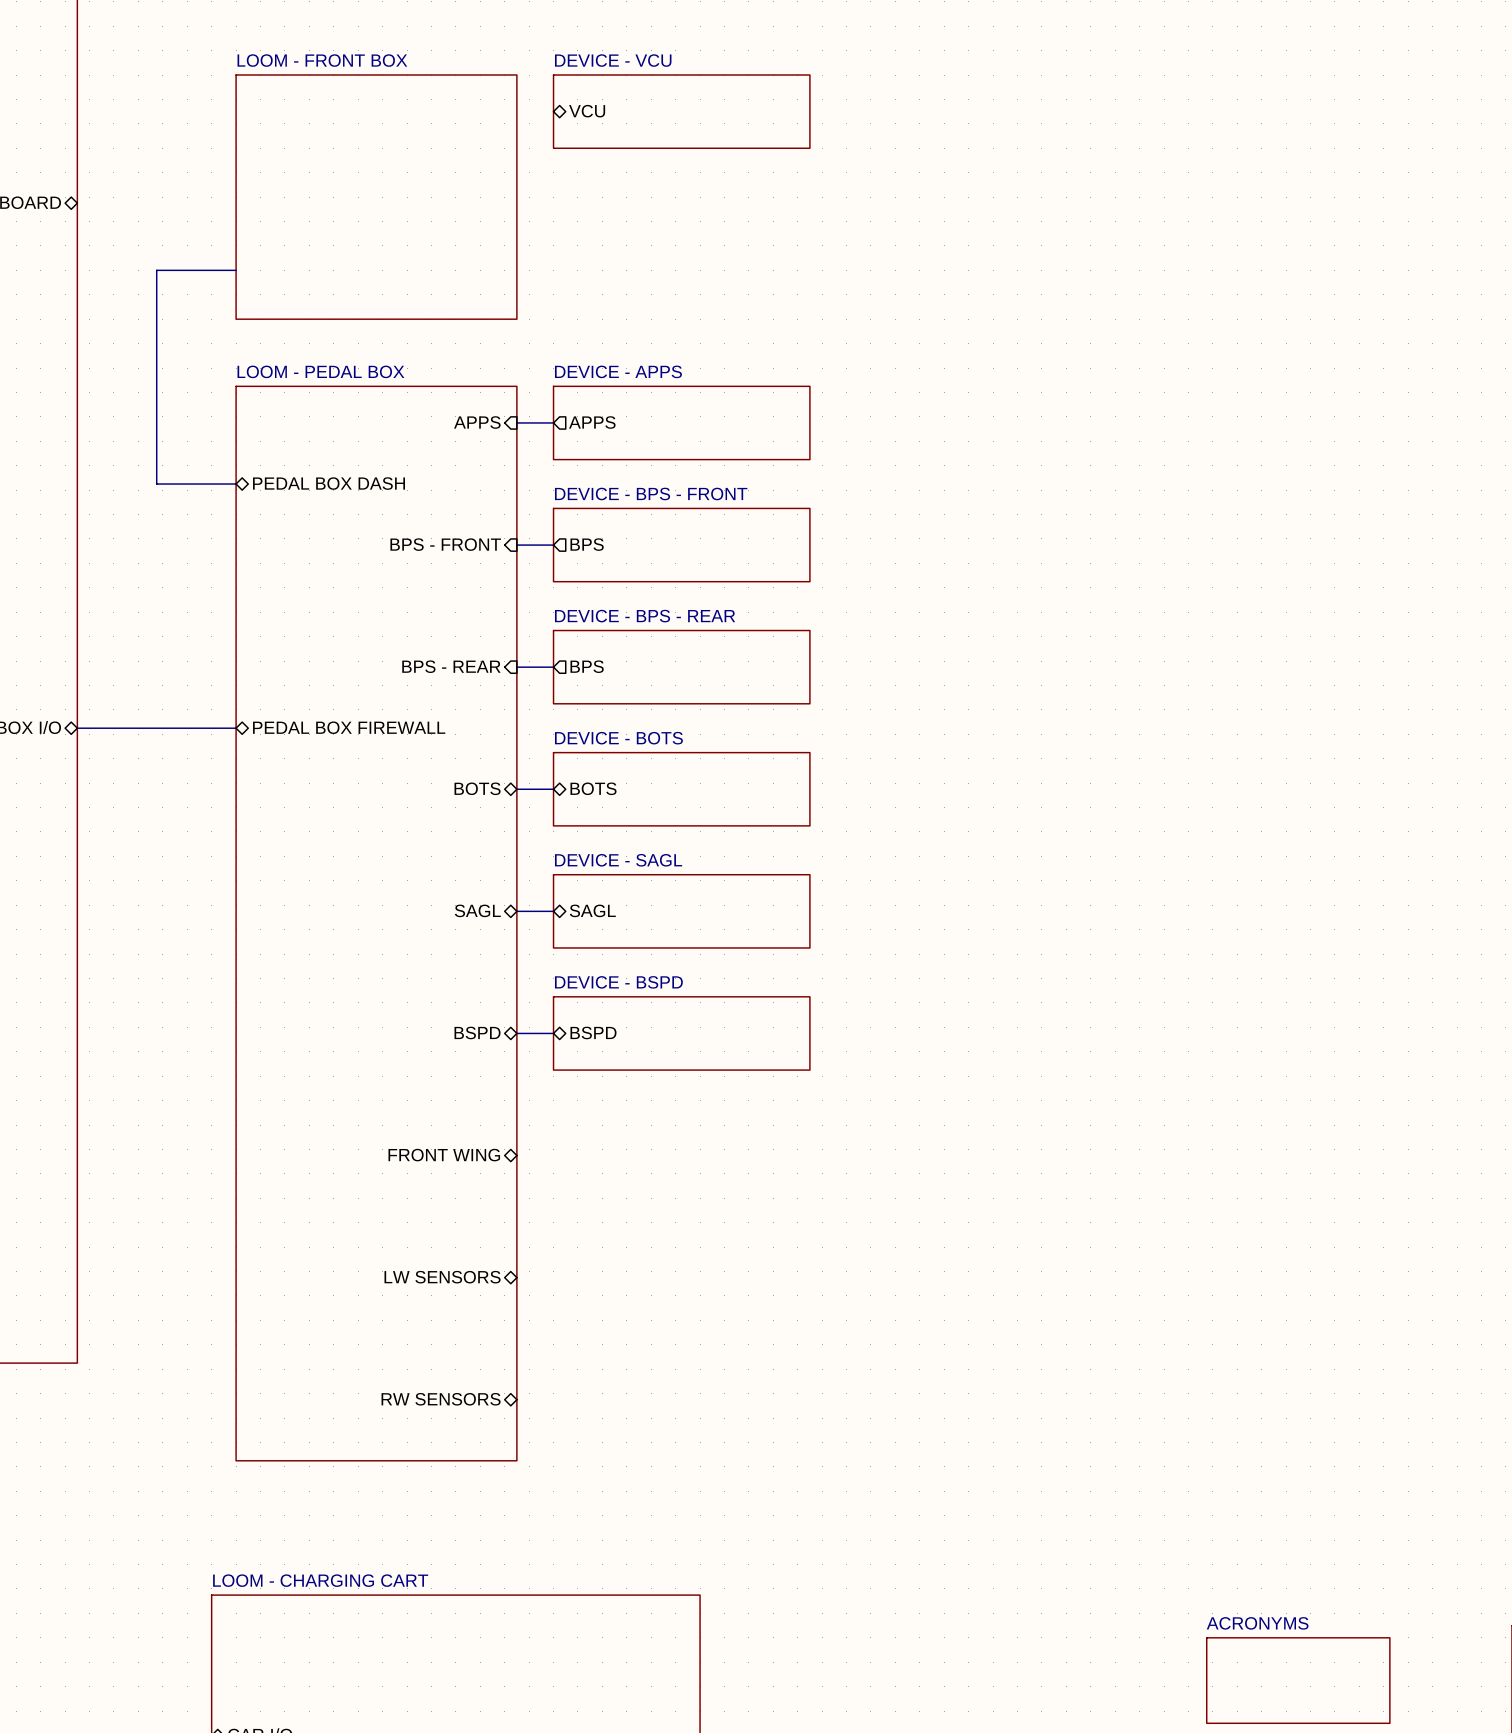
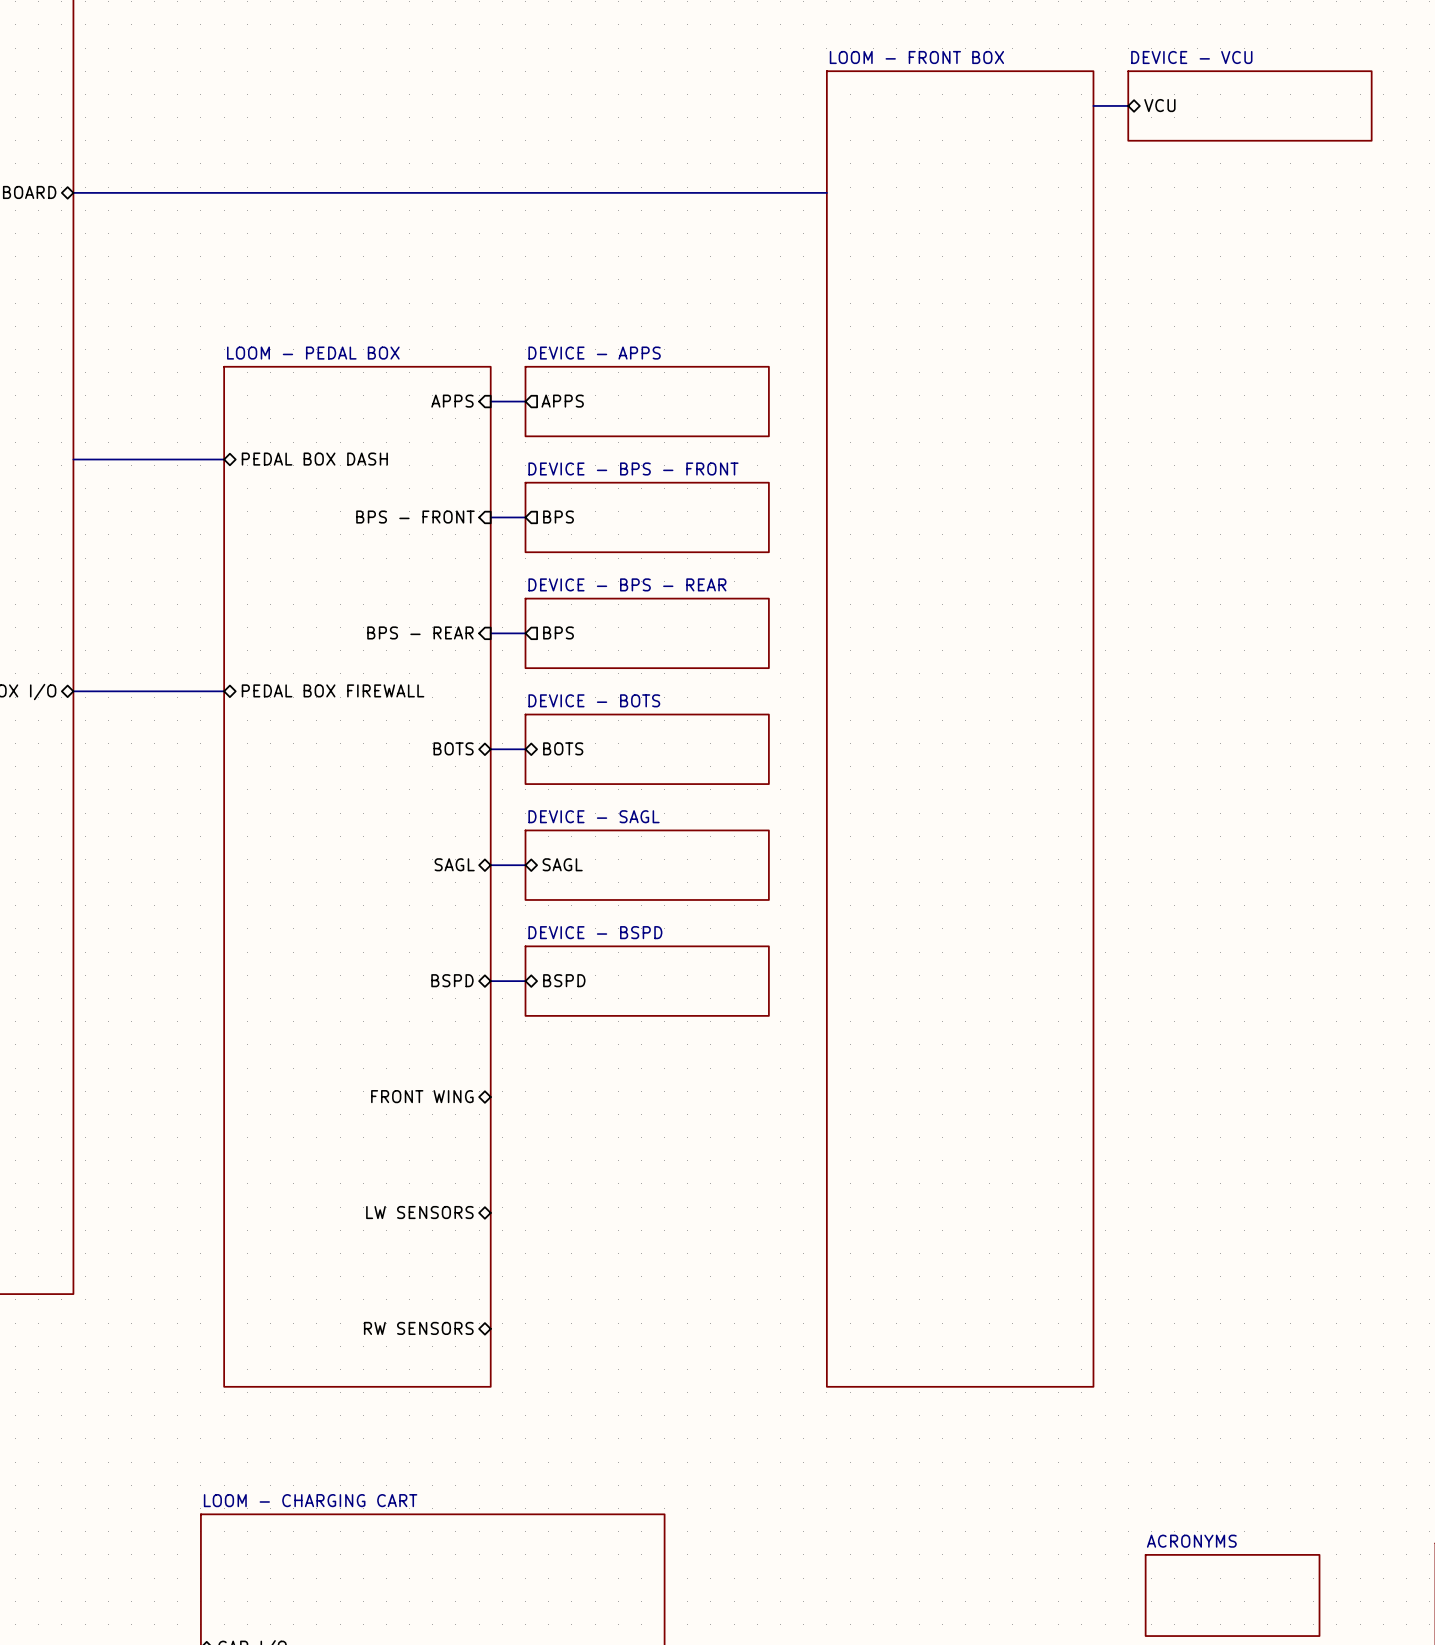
sheet pin: VCU (587, 111) -> none
sheet DEVICE - VCU: (681, 111) -> none
wire: none -> (1093, 105) (1128, 105)
sheet pin: none -> VCU (1159, 105)
sheet DEVICE - VCU: none -> (1249, 105)
sheet LOOM - FRONT BOX: (376, 197) -> none
wire: none -> (73, 192) (826, 192)
wire: (236, 270) (156, 270) (156, 484) -> (73, 459) (148, 459)
sheet LOOM - FRONT BOX: none -> (960, 729)

